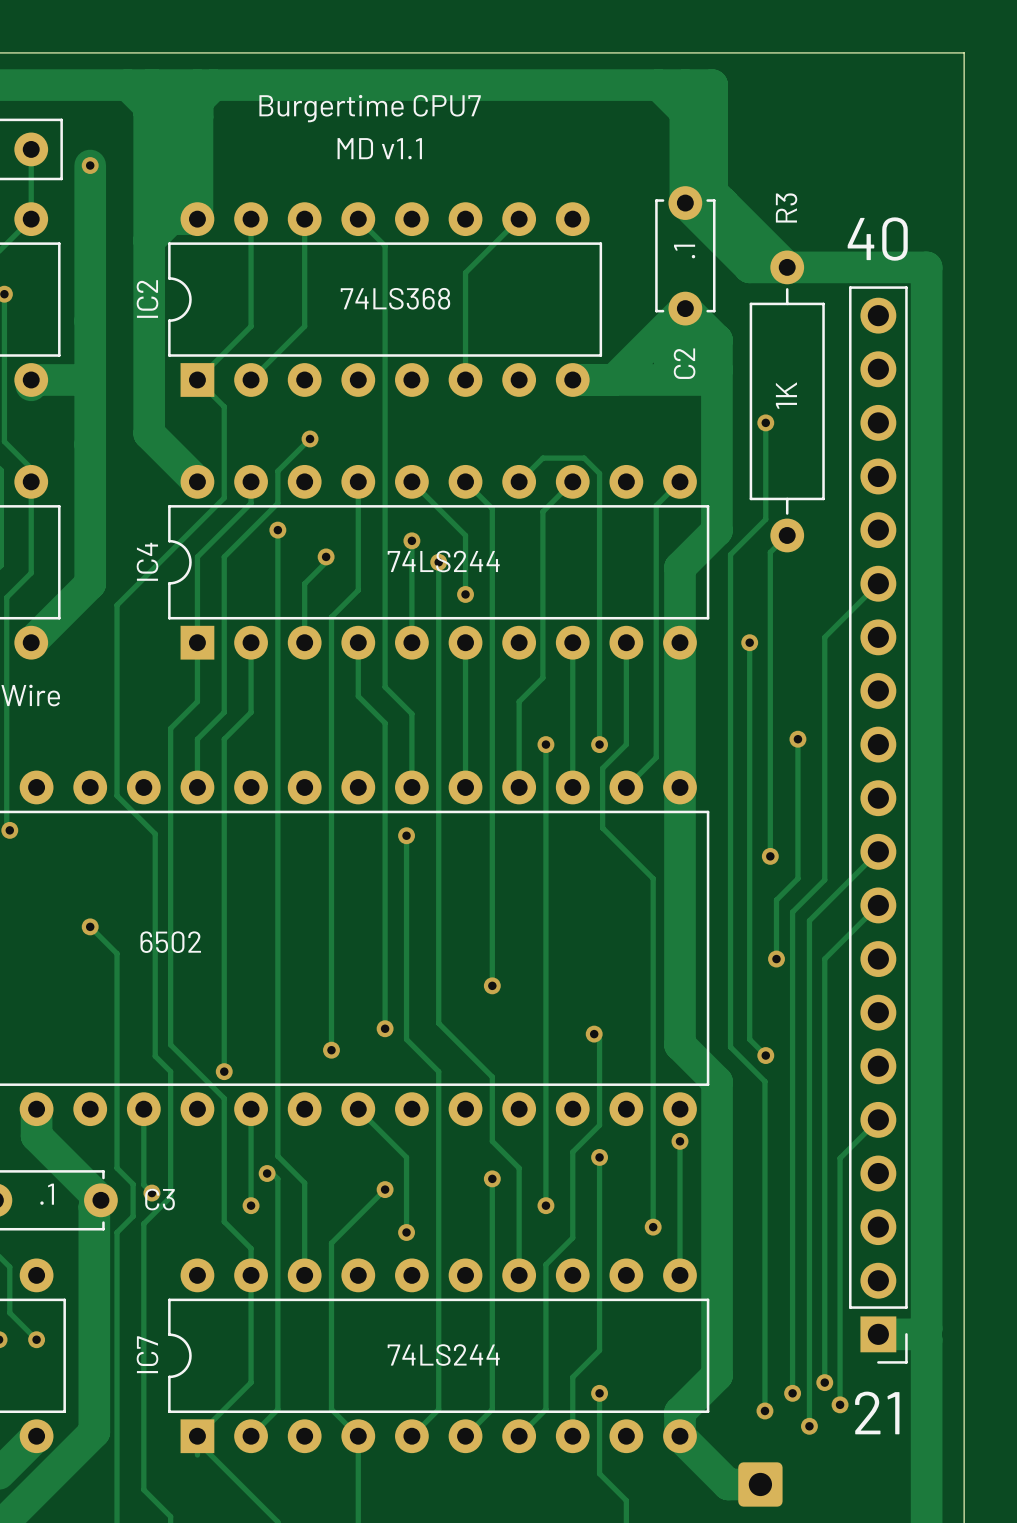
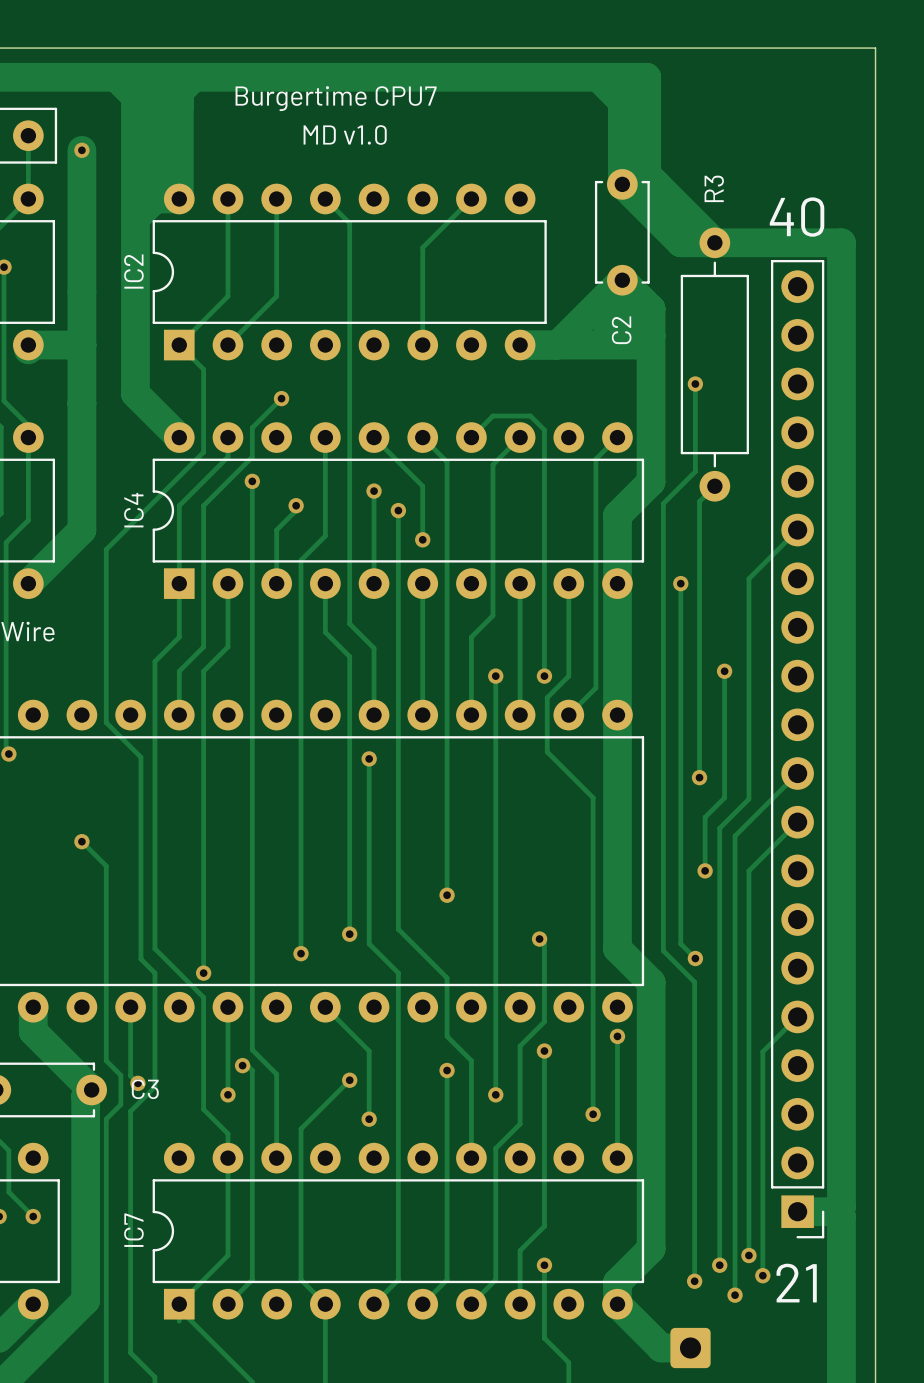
text: MD v1.1 (379, 148) -> MD v1.0 (345, 134)
C2 value: .1 (684, 251) -> none
IC2 value: 74LS368 (395, 298) -> none
R3 value: 1K (786, 395) -> none
IC4 value: 74LS244 (443, 561) -> none
part value: 6502 (170, 942) -> none
C3 value: .1 (47, 1194) -> none
IC7 value: 74LS244 (443, 1355) -> none

